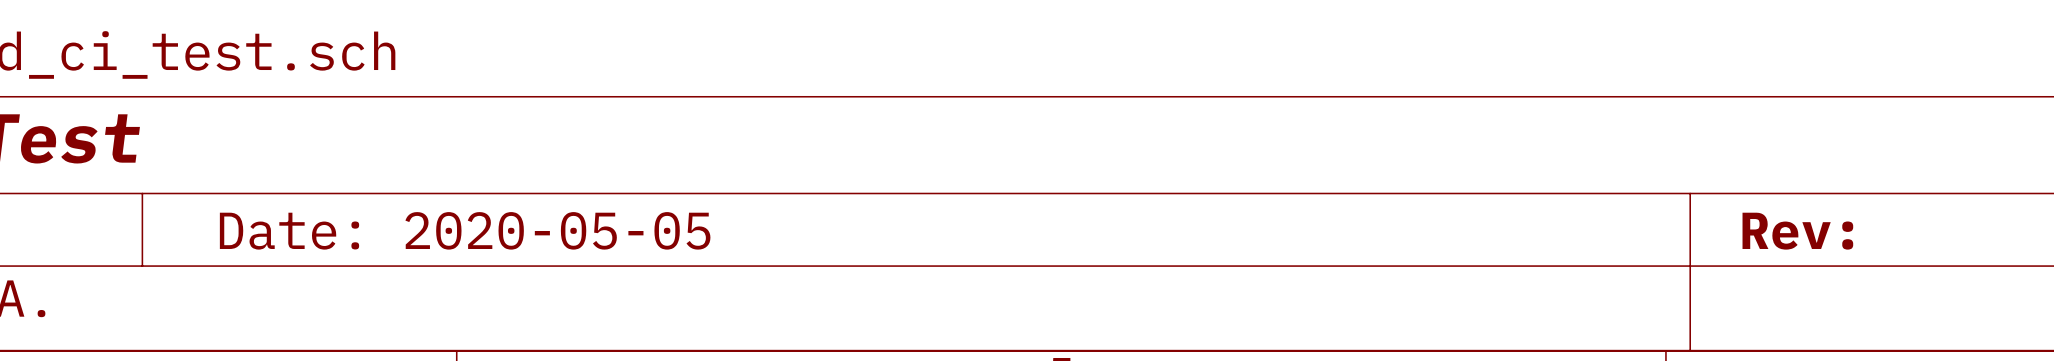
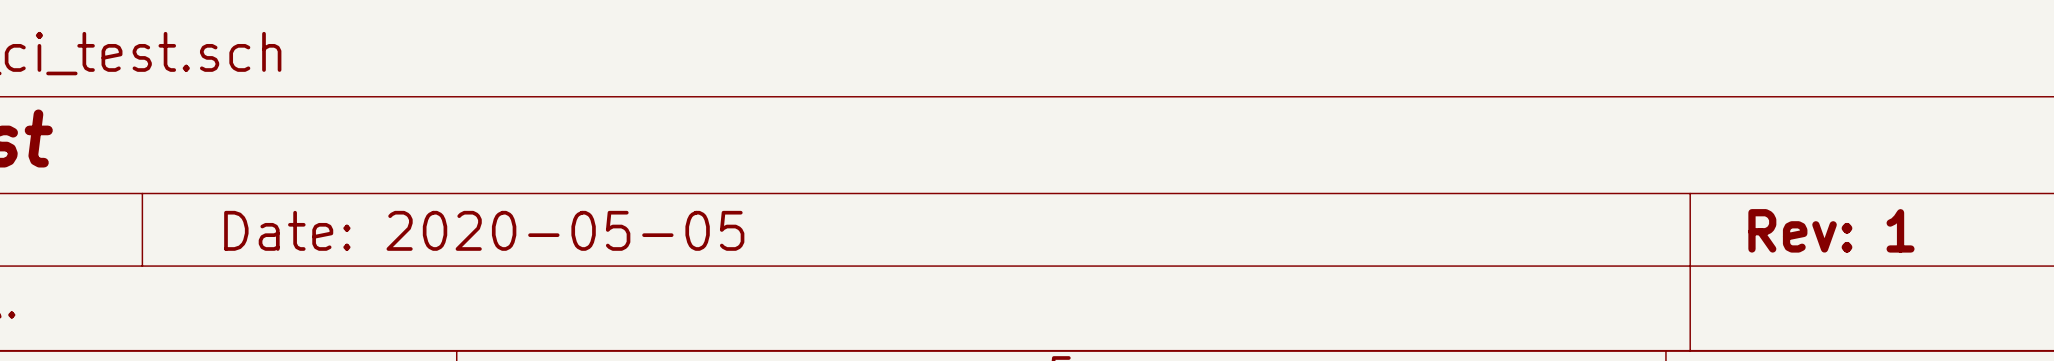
title block: Rev: (1797, 231) -> Rev: 1 (1831, 230)

